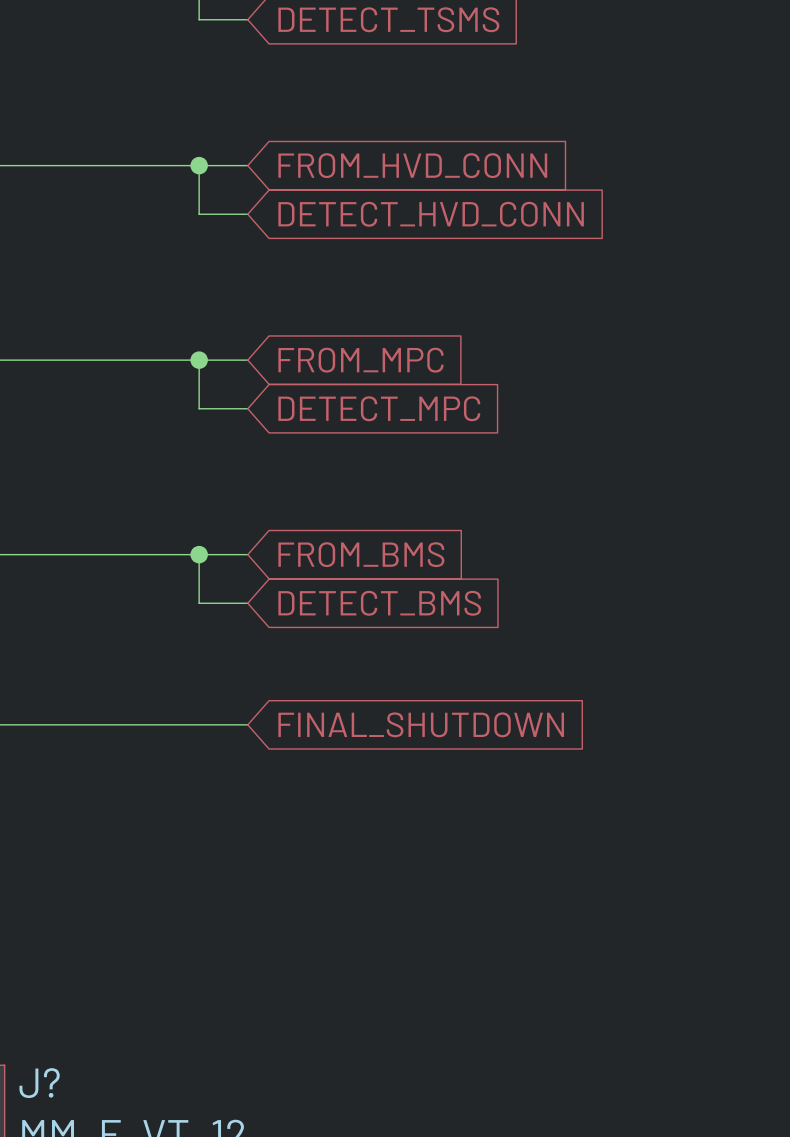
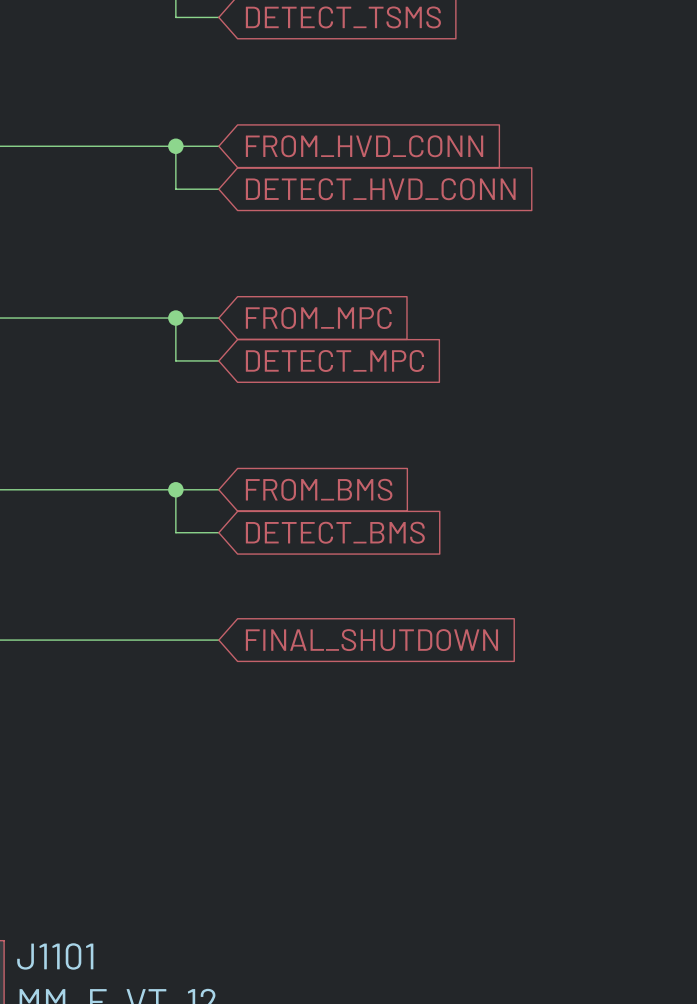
J? name: J? (39, 1083) -> J1101 (55, 956)

